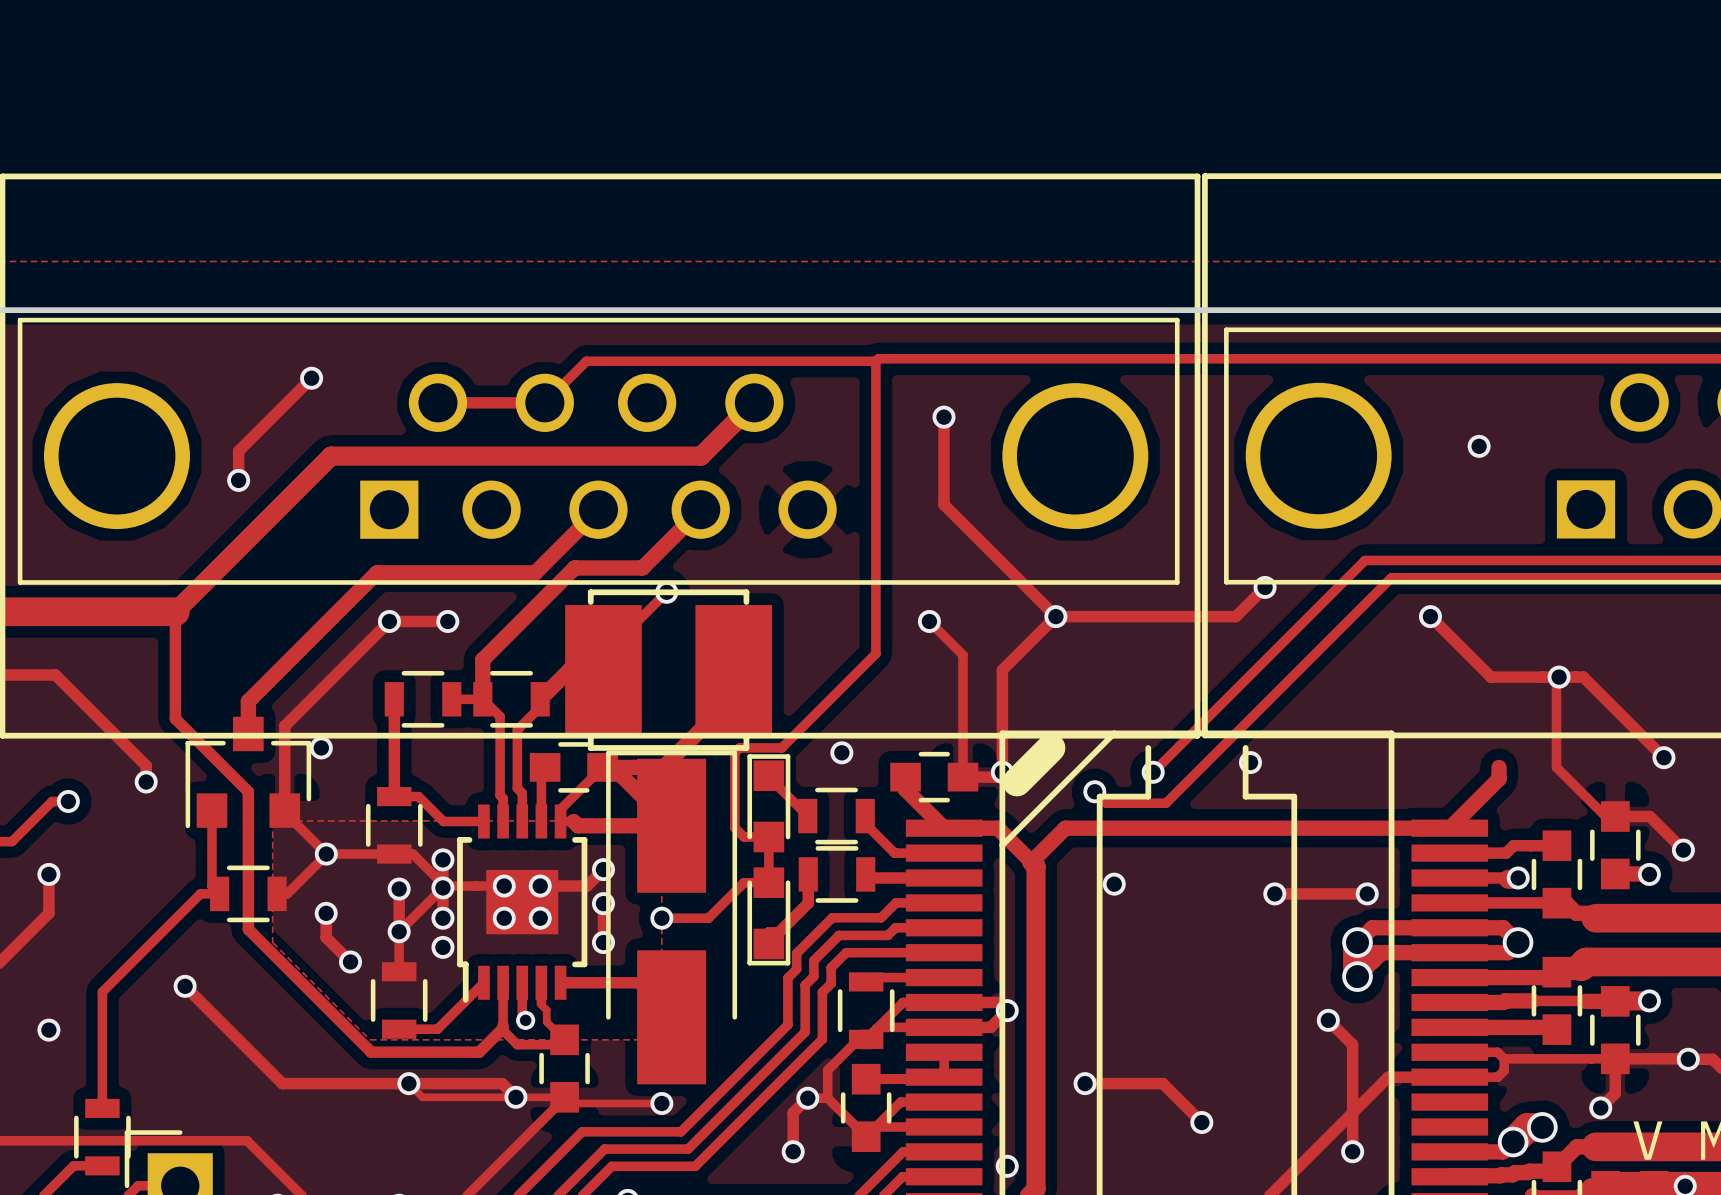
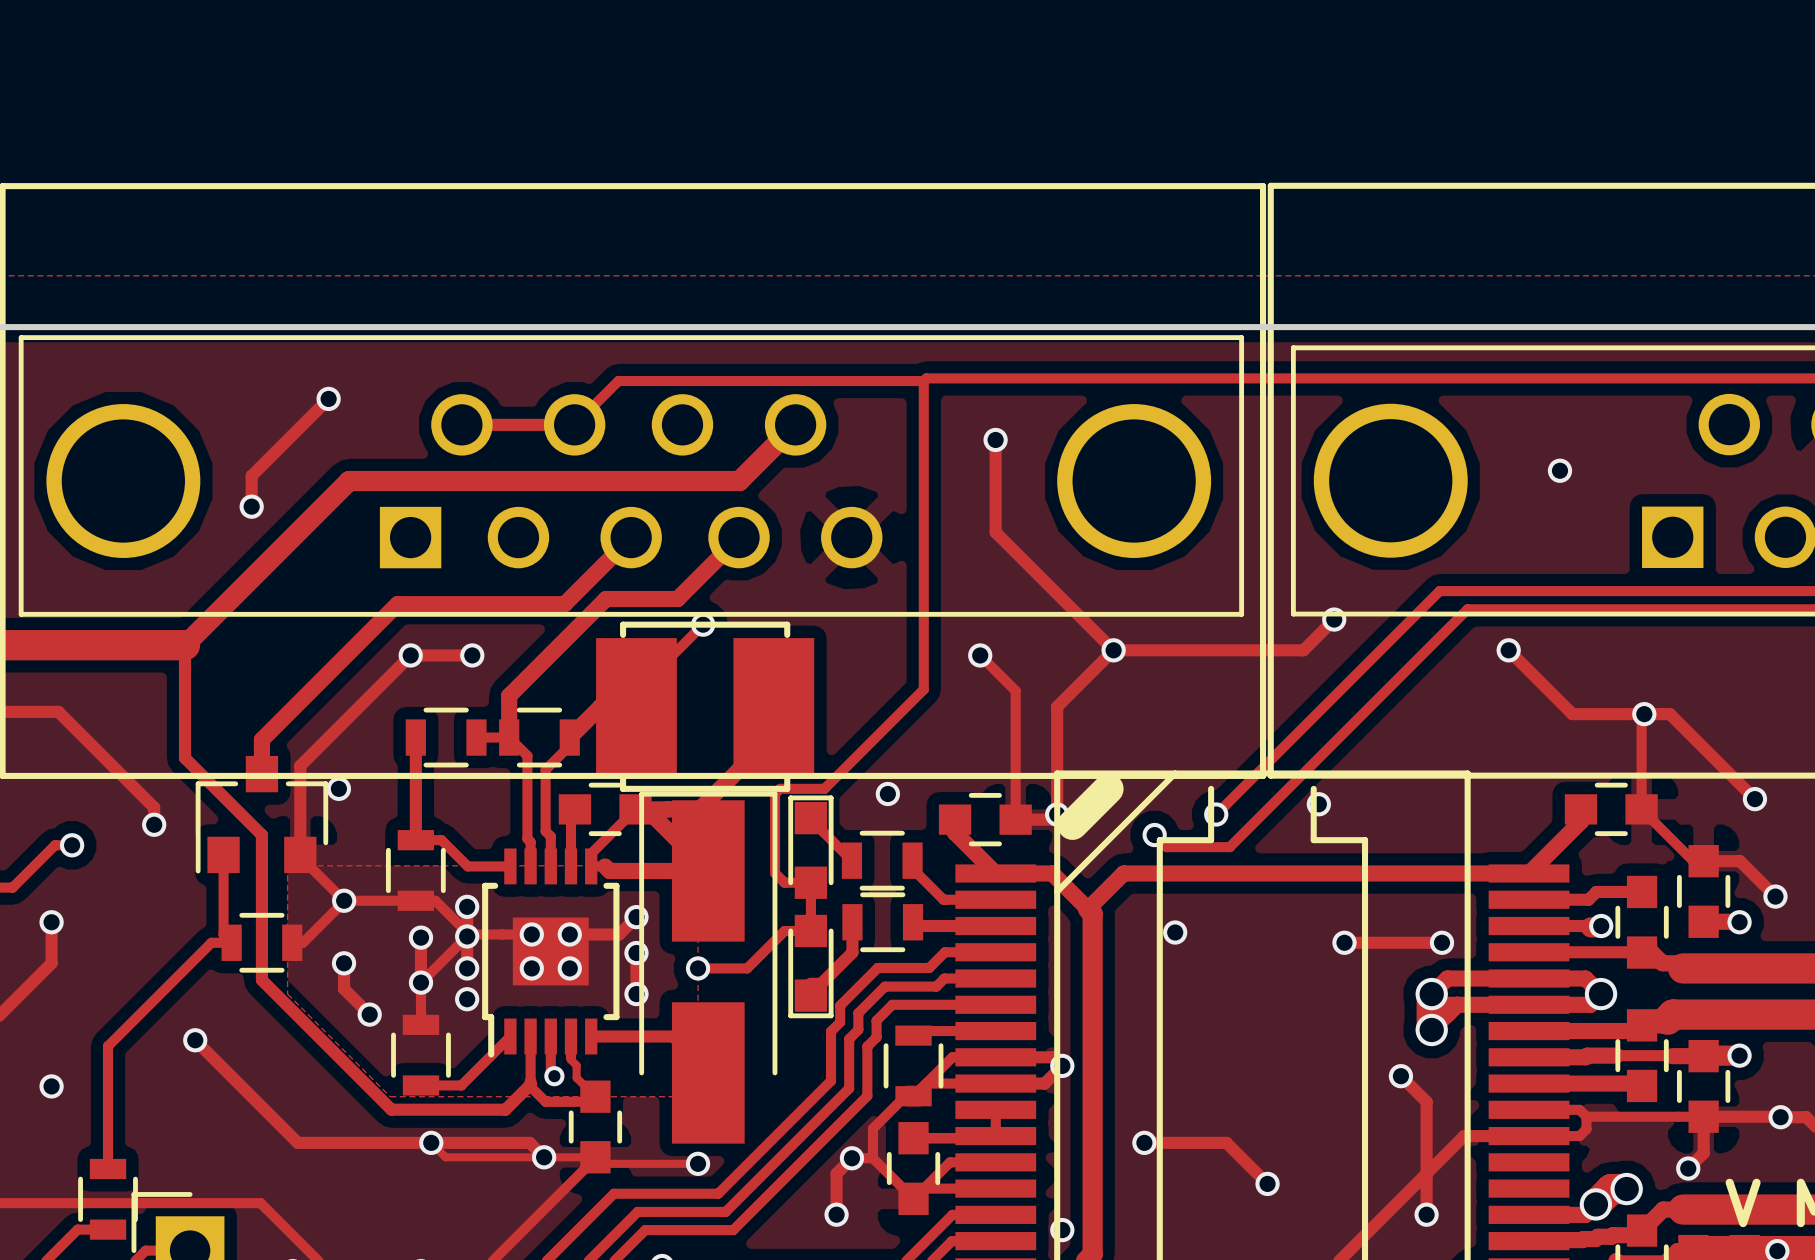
part: none -> (1611, 809)

